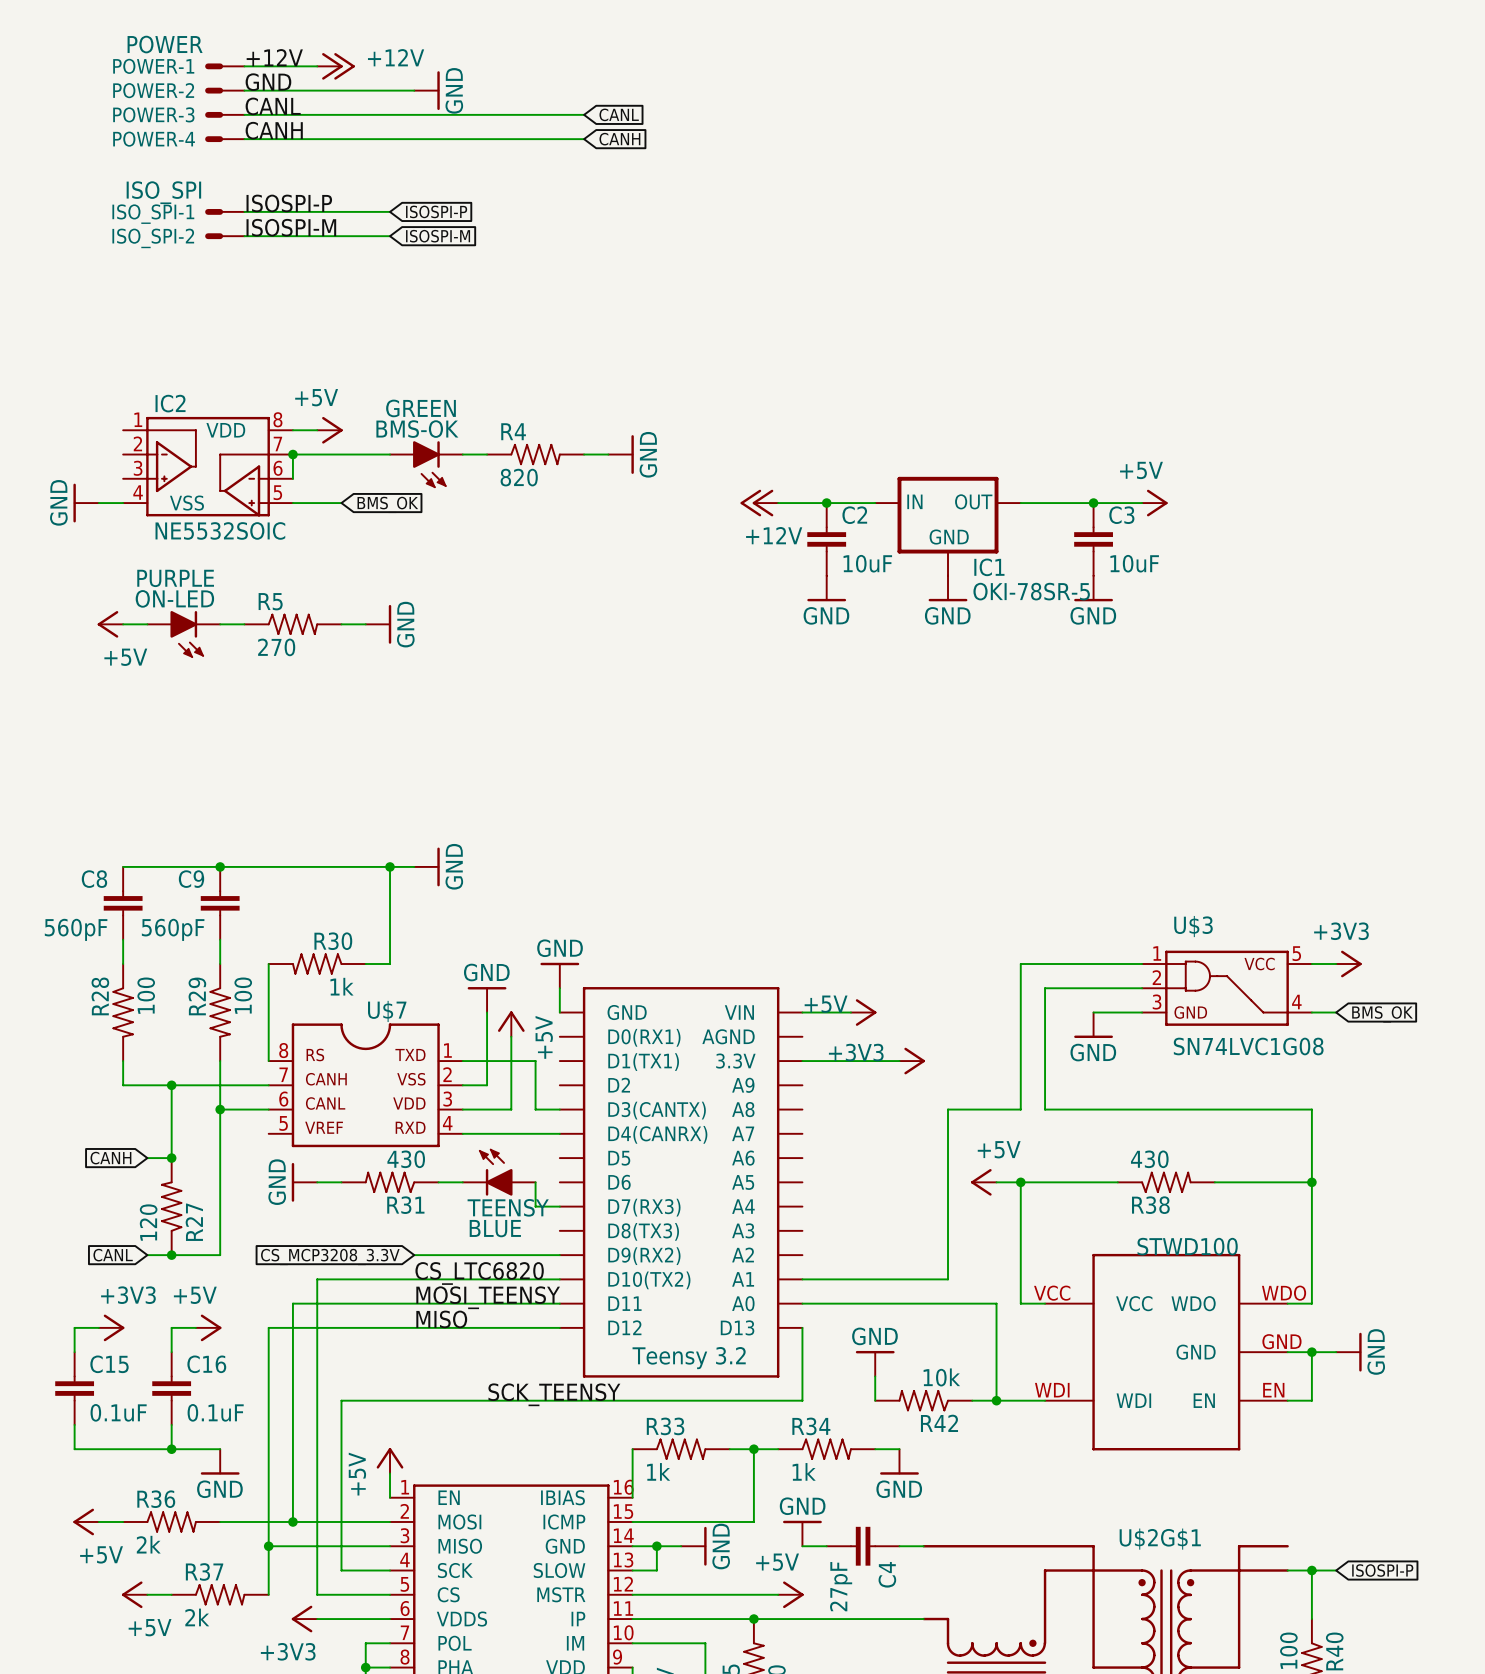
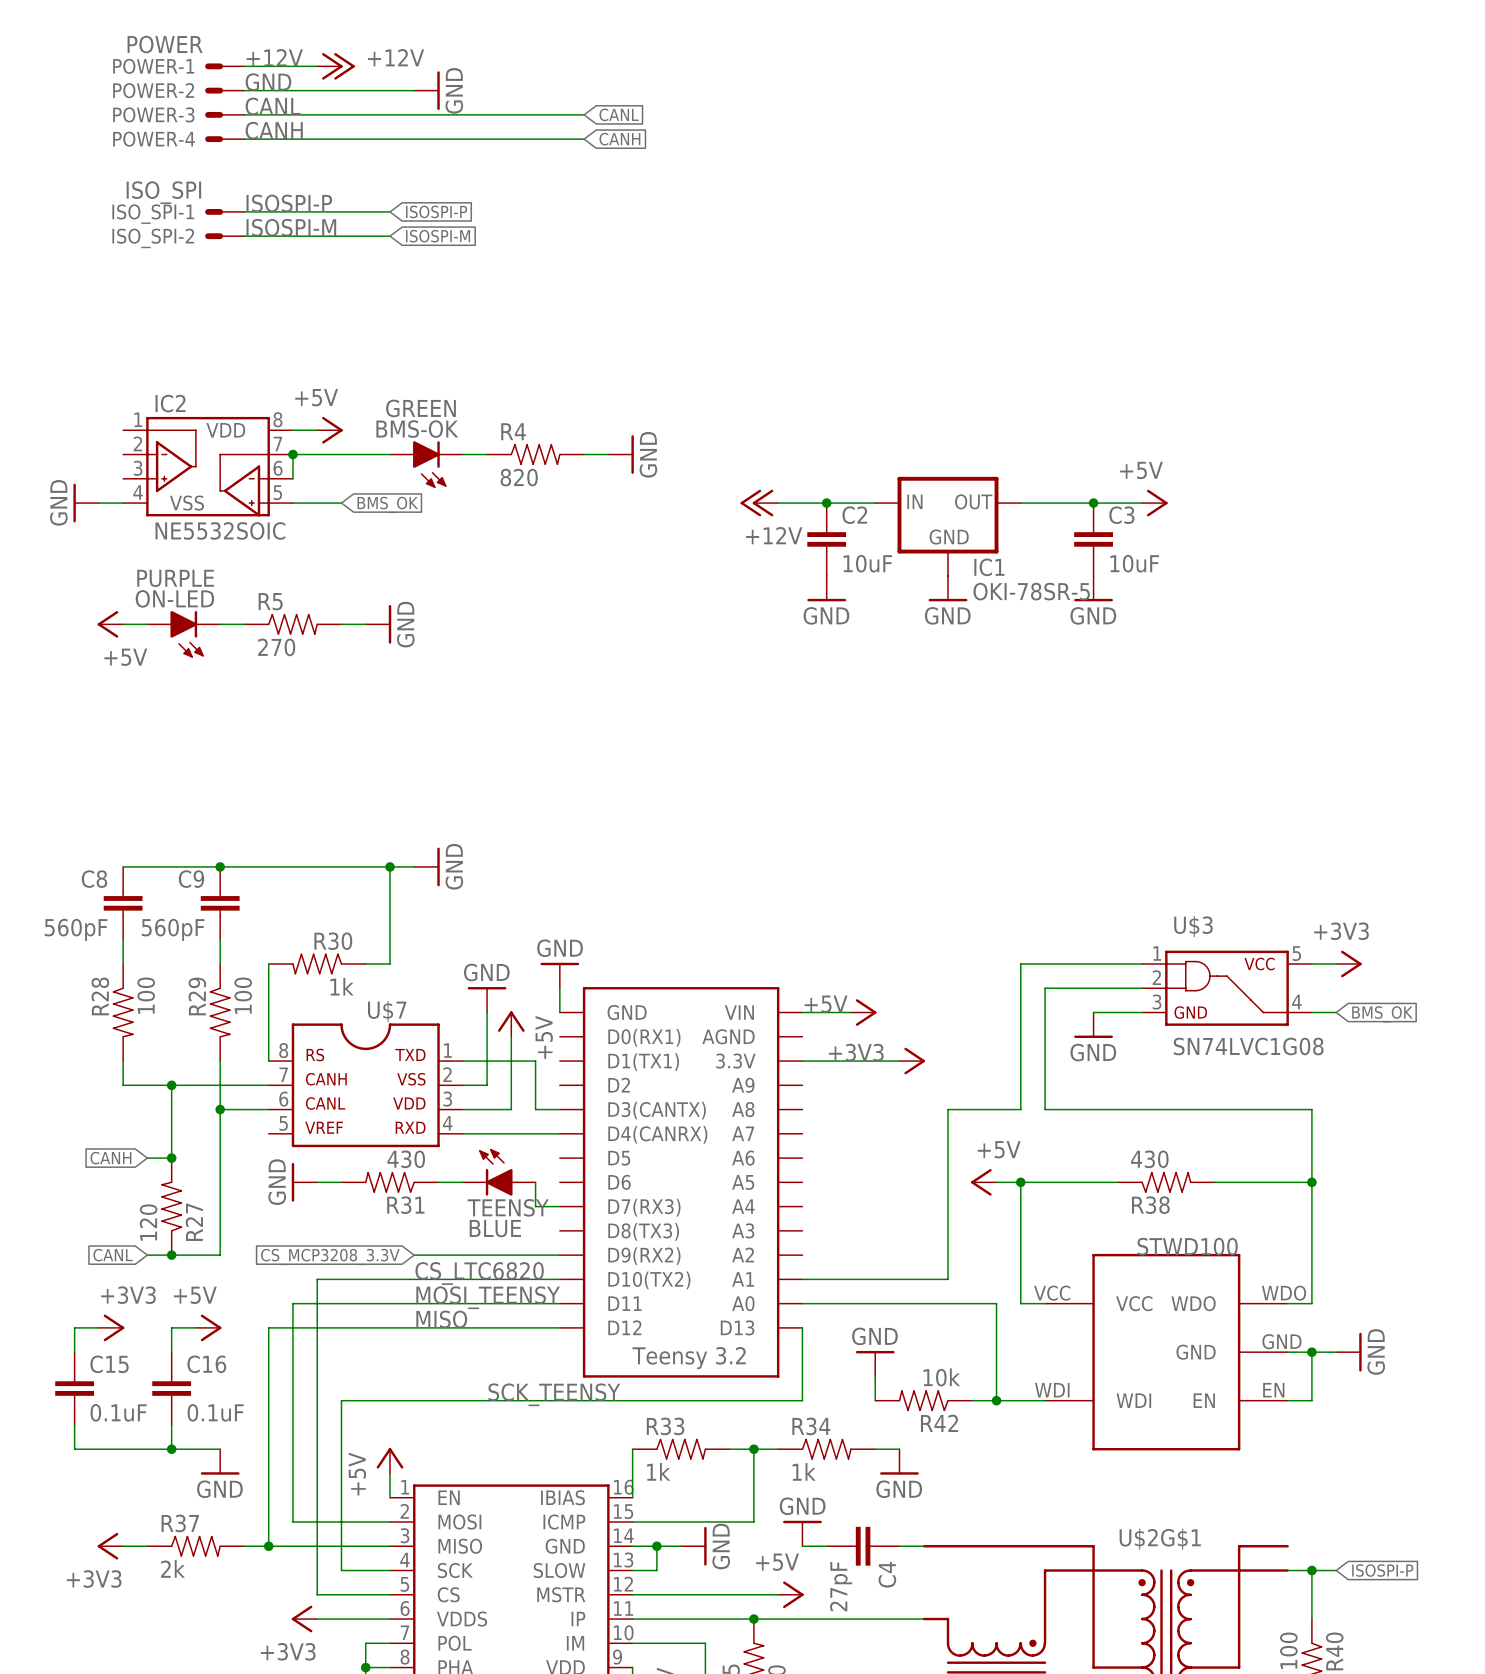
power symbol: +5V (86, 1521) -> none
wire: (98, 1521) (123, 1521) -> (123, 1546) (147, 1546)
R36: 2k (171, 1521) -> none
wire: (220, 1521) (292, 1521) -> none
junction: (292, 1521) -> none
power symbol: none -> +3V3 (110, 1546)
wire: (268, 1546) (268, 1594) -> (268, 1546) (244, 1546)
power symbol: +5V (134, 1594) -> none
wire: (147, 1594) (171, 1594) -> none
R37 position: (220, 1594) -> (195, 1546)

